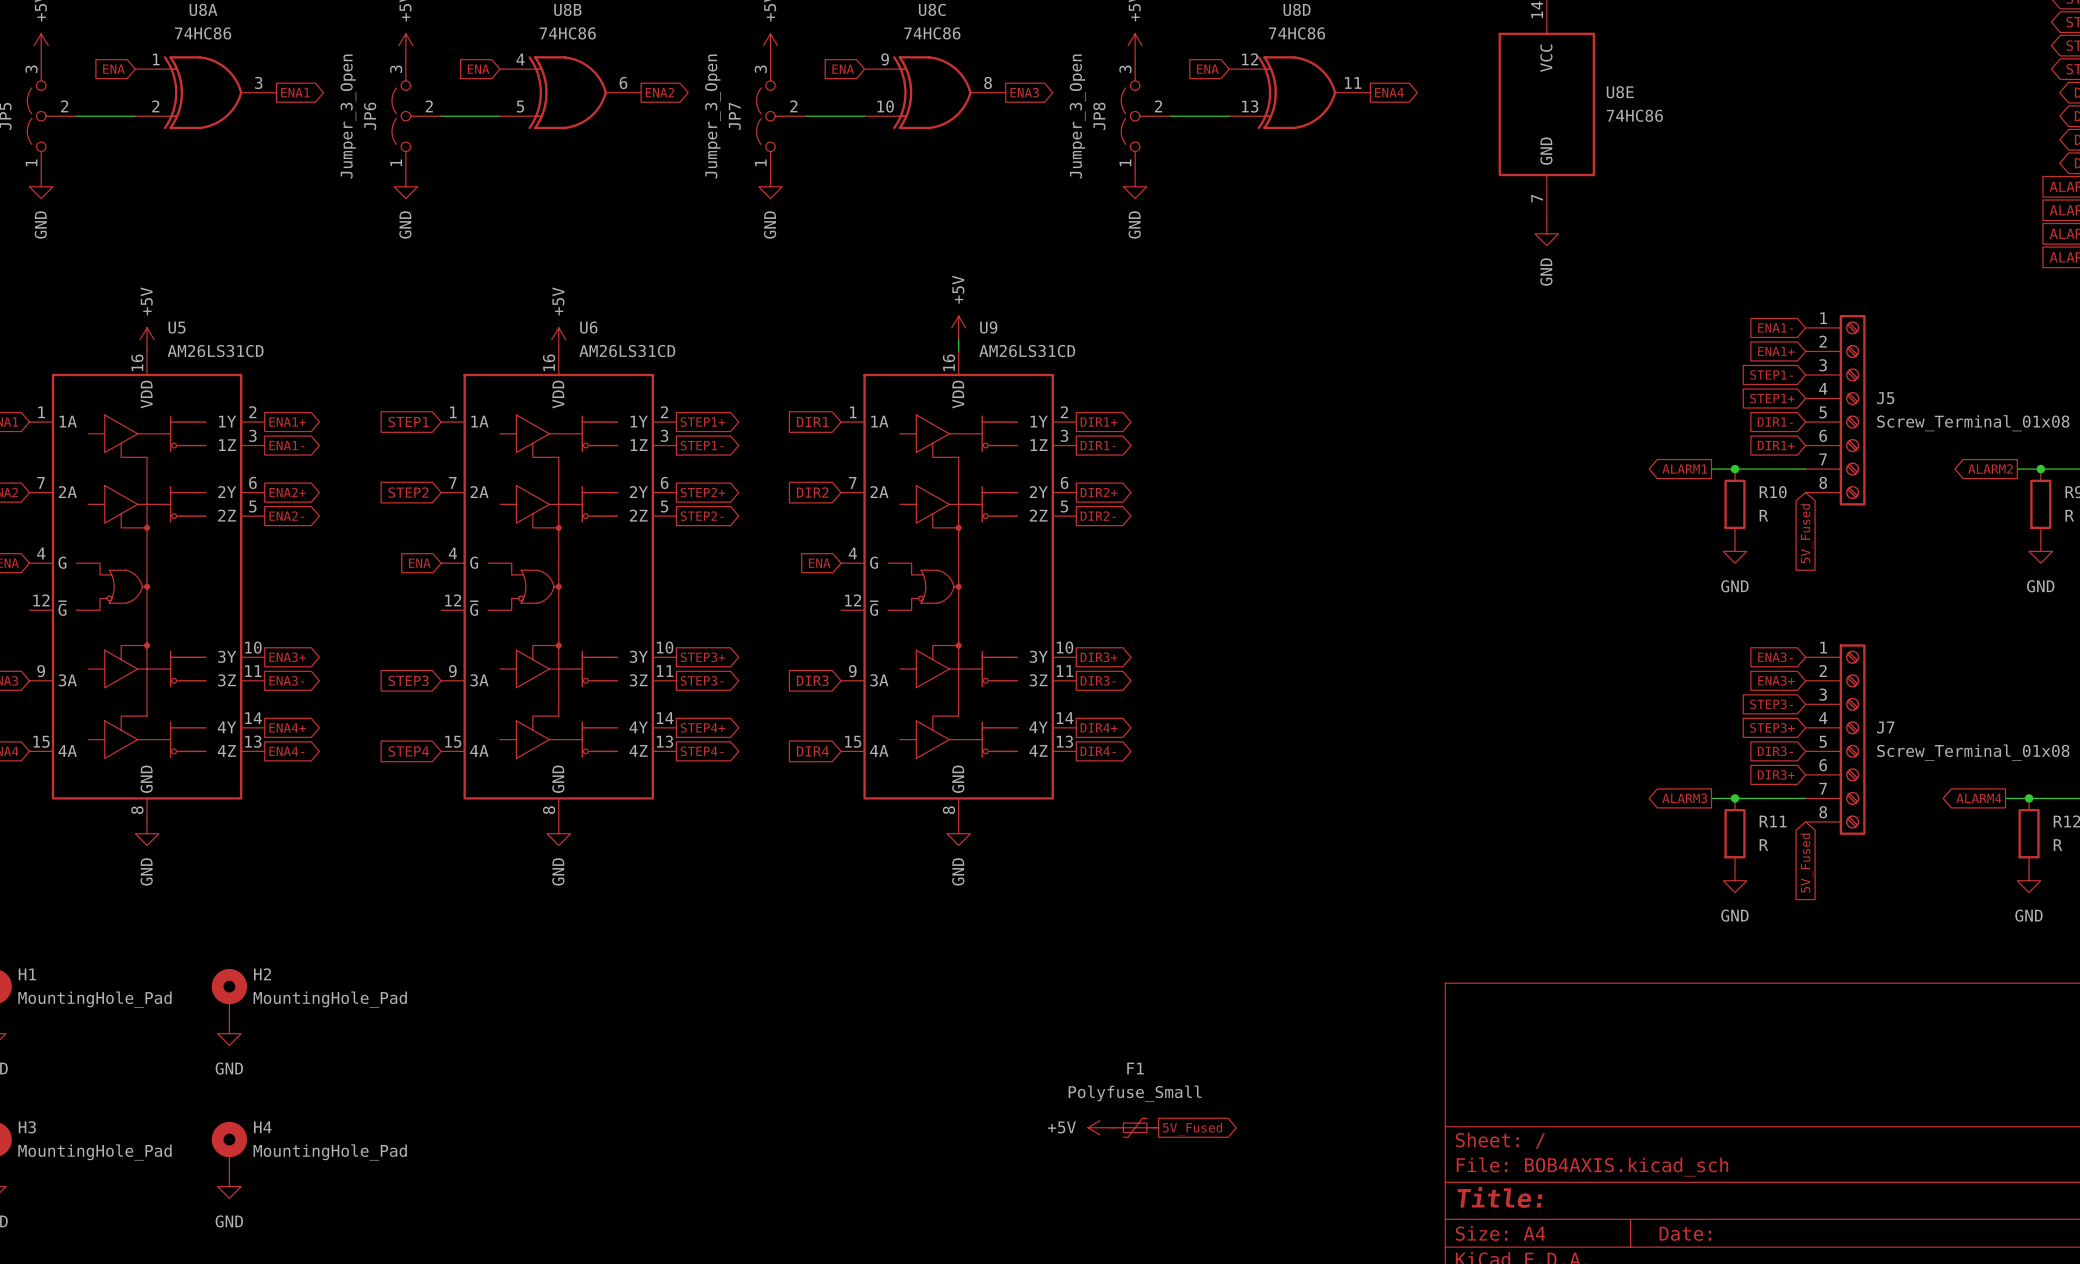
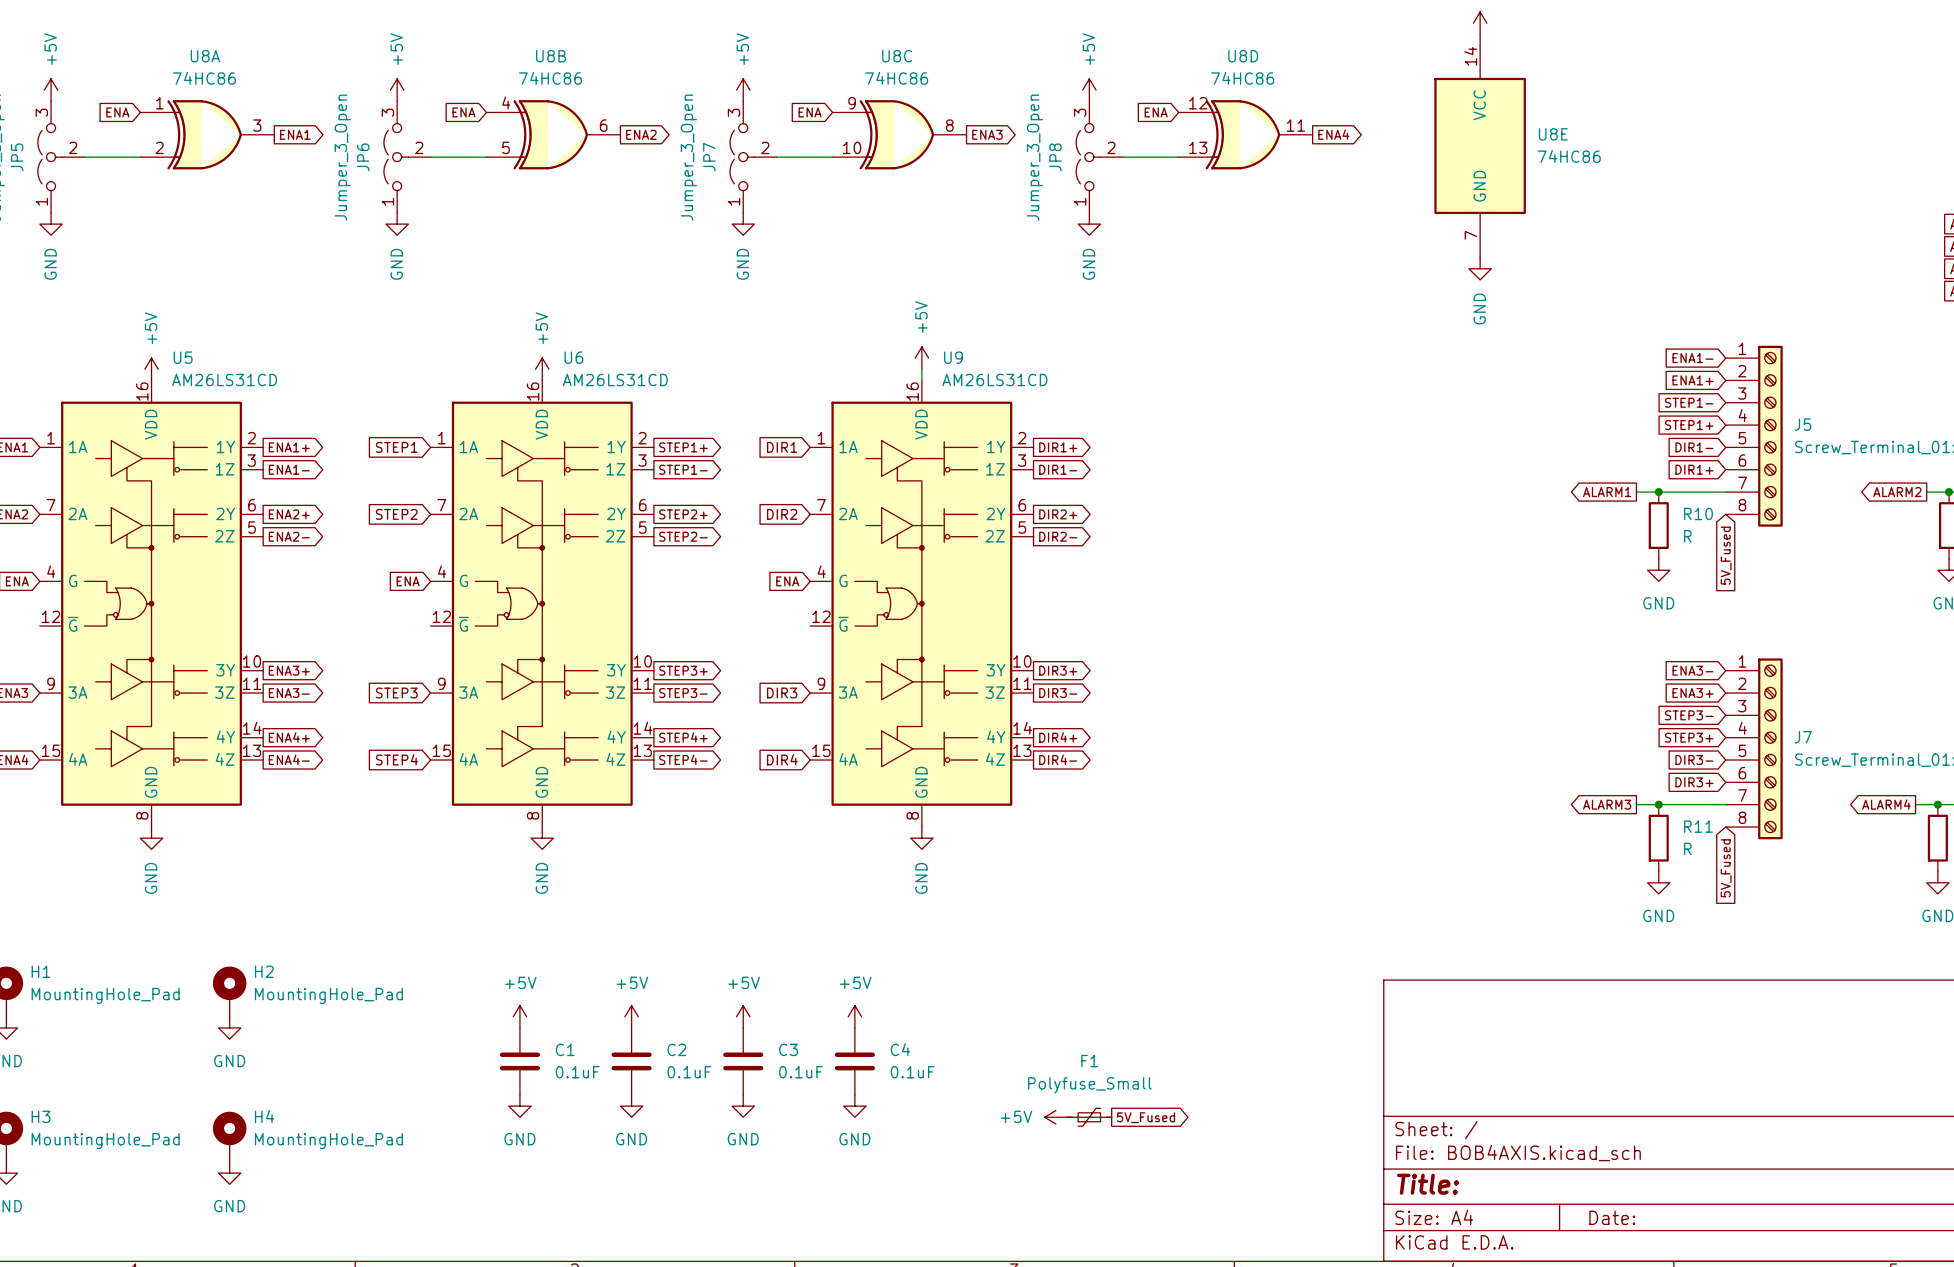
power symbol: none -> +5V (519, 1016)
power symbol: none -> +5V (631, 1016)
power symbol: none -> +5V (743, 1016)
power symbol: none -> +5V (854, 1016)
C1: none -> 0.1uF (519, 1061)
C2: none -> 0.1uF (631, 1061)
C3: none -> 0.1uF (743, 1061)
C4: none -> 0.1uF (854, 1061)
power symbol: none -> GND (519, 1106)
power symbol: none -> GND (631, 1106)
power symbol: none -> GND (743, 1106)
power symbol: none -> GND (854, 1106)

